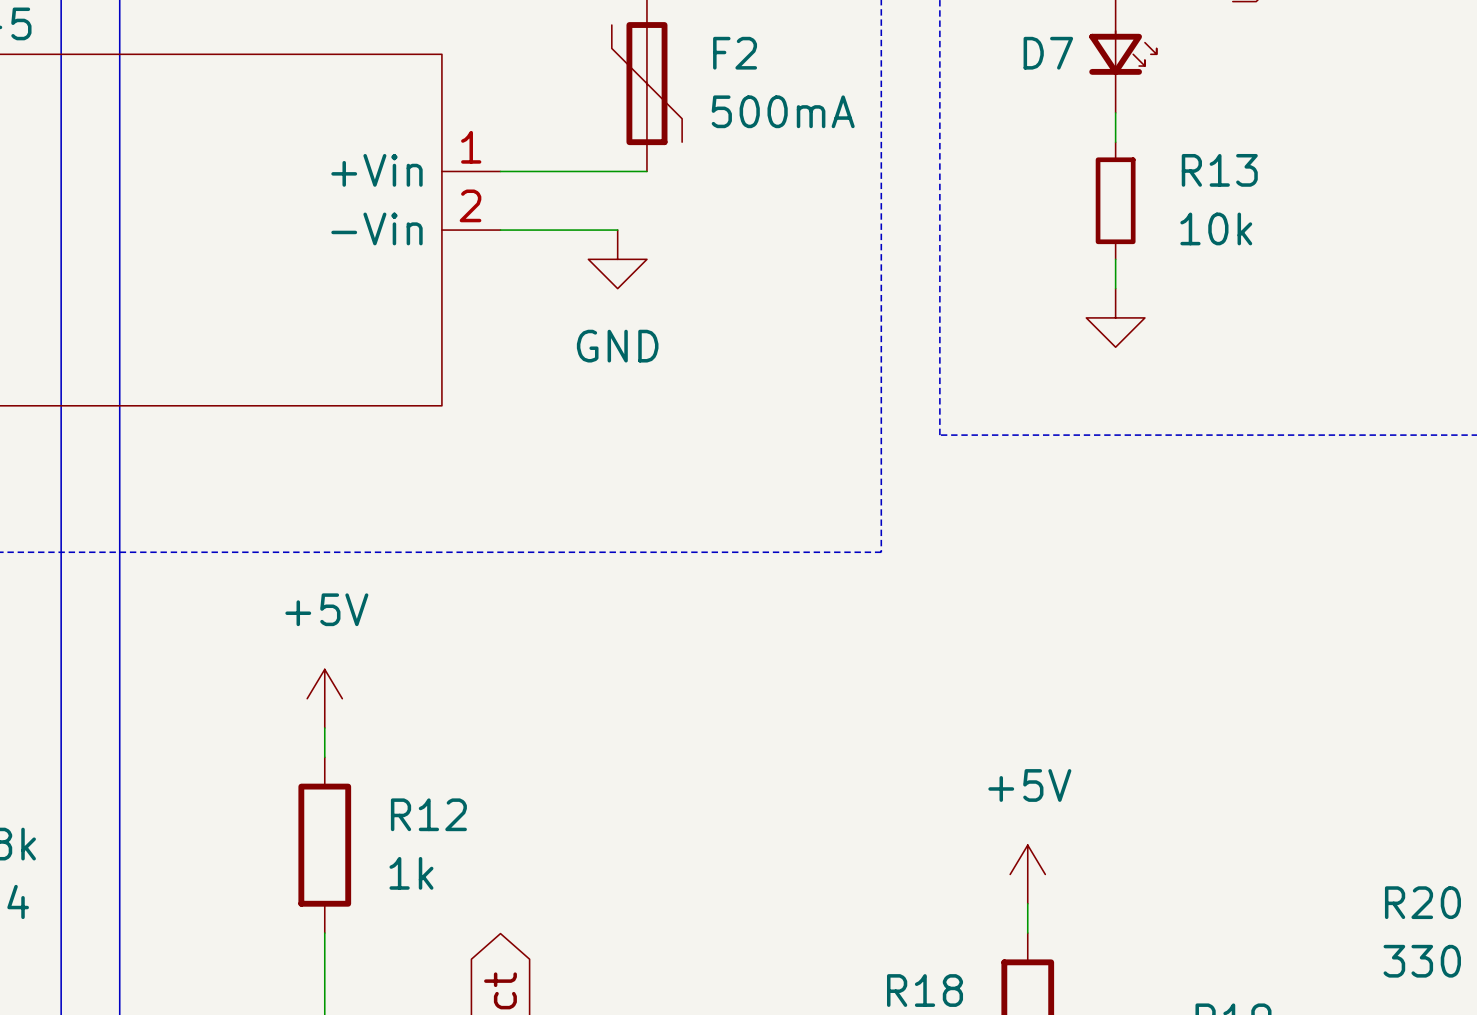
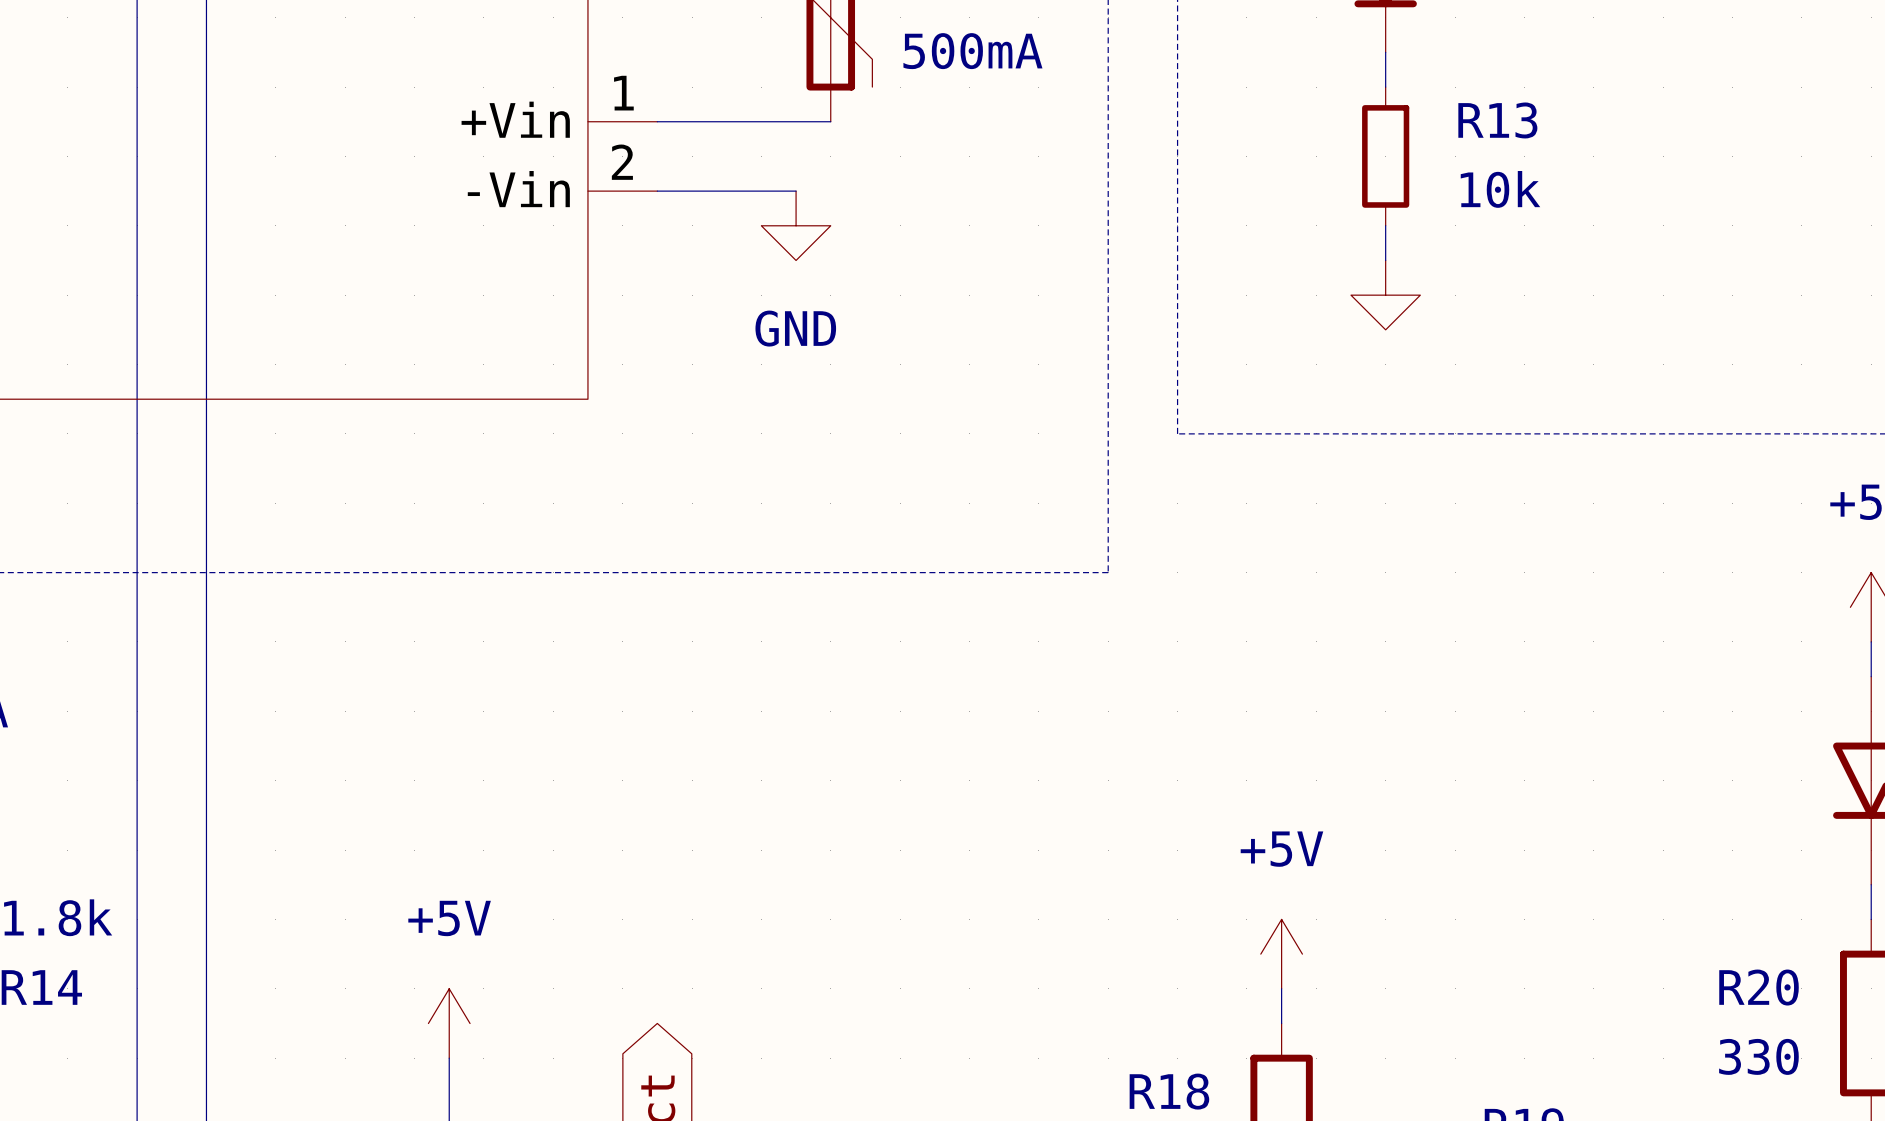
power symbol position: +5V (324, 698) -> +5V (449, 1023)
wire: (324, 728) (324, 757) -> none
R12: 1k (324, 845) -> none

